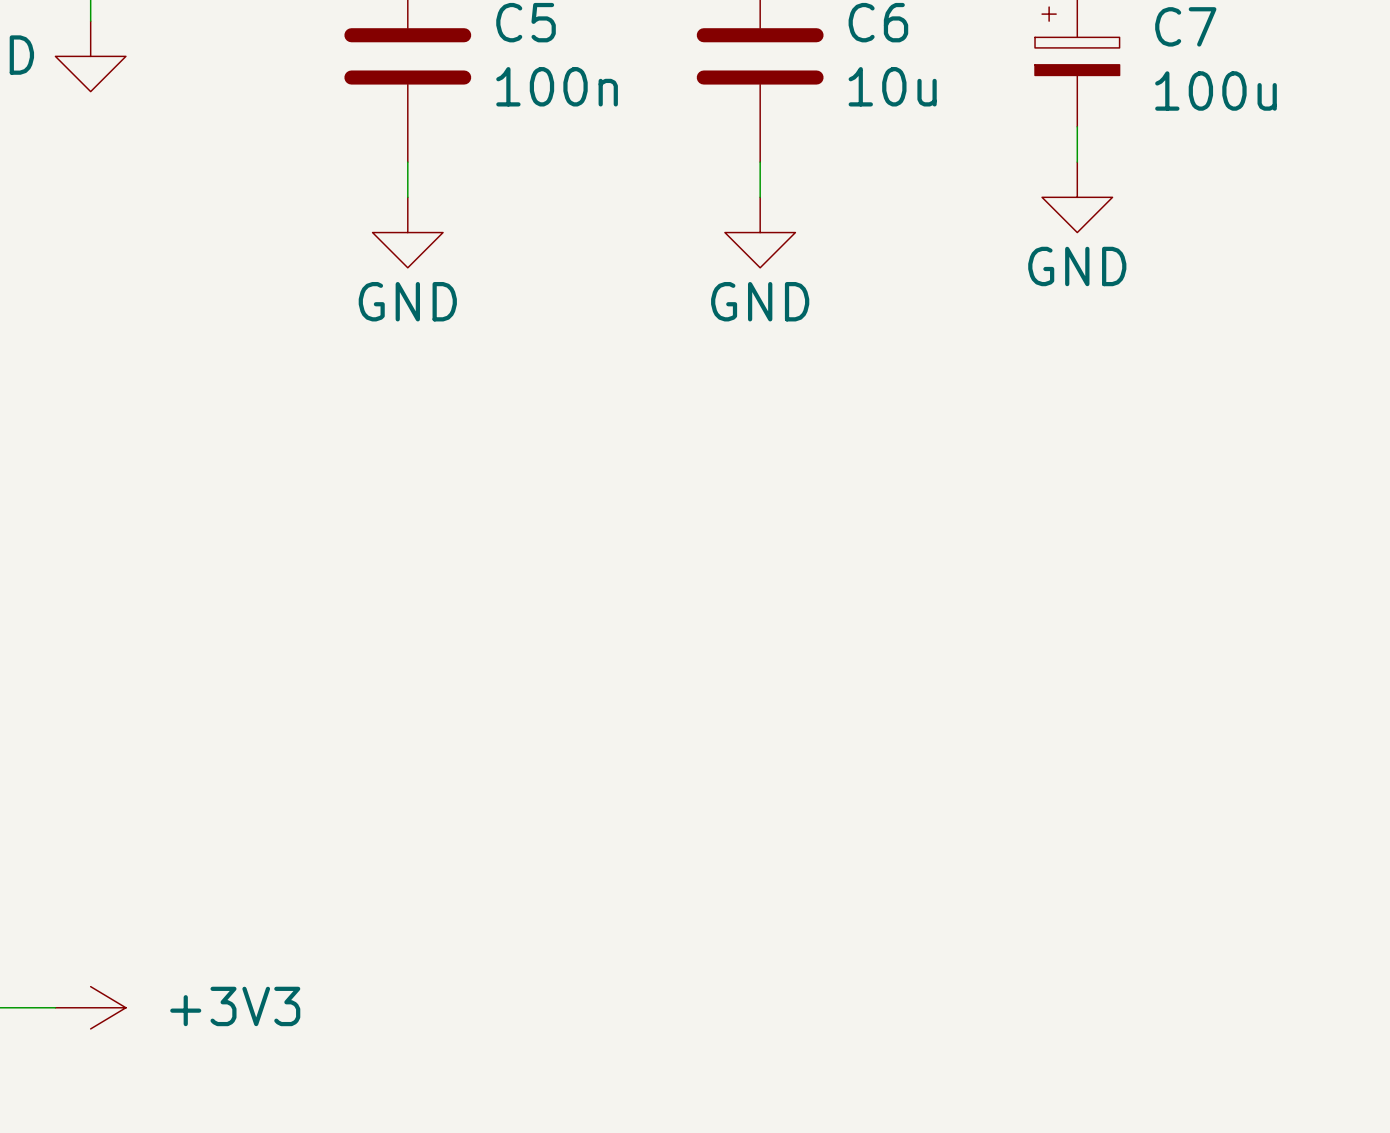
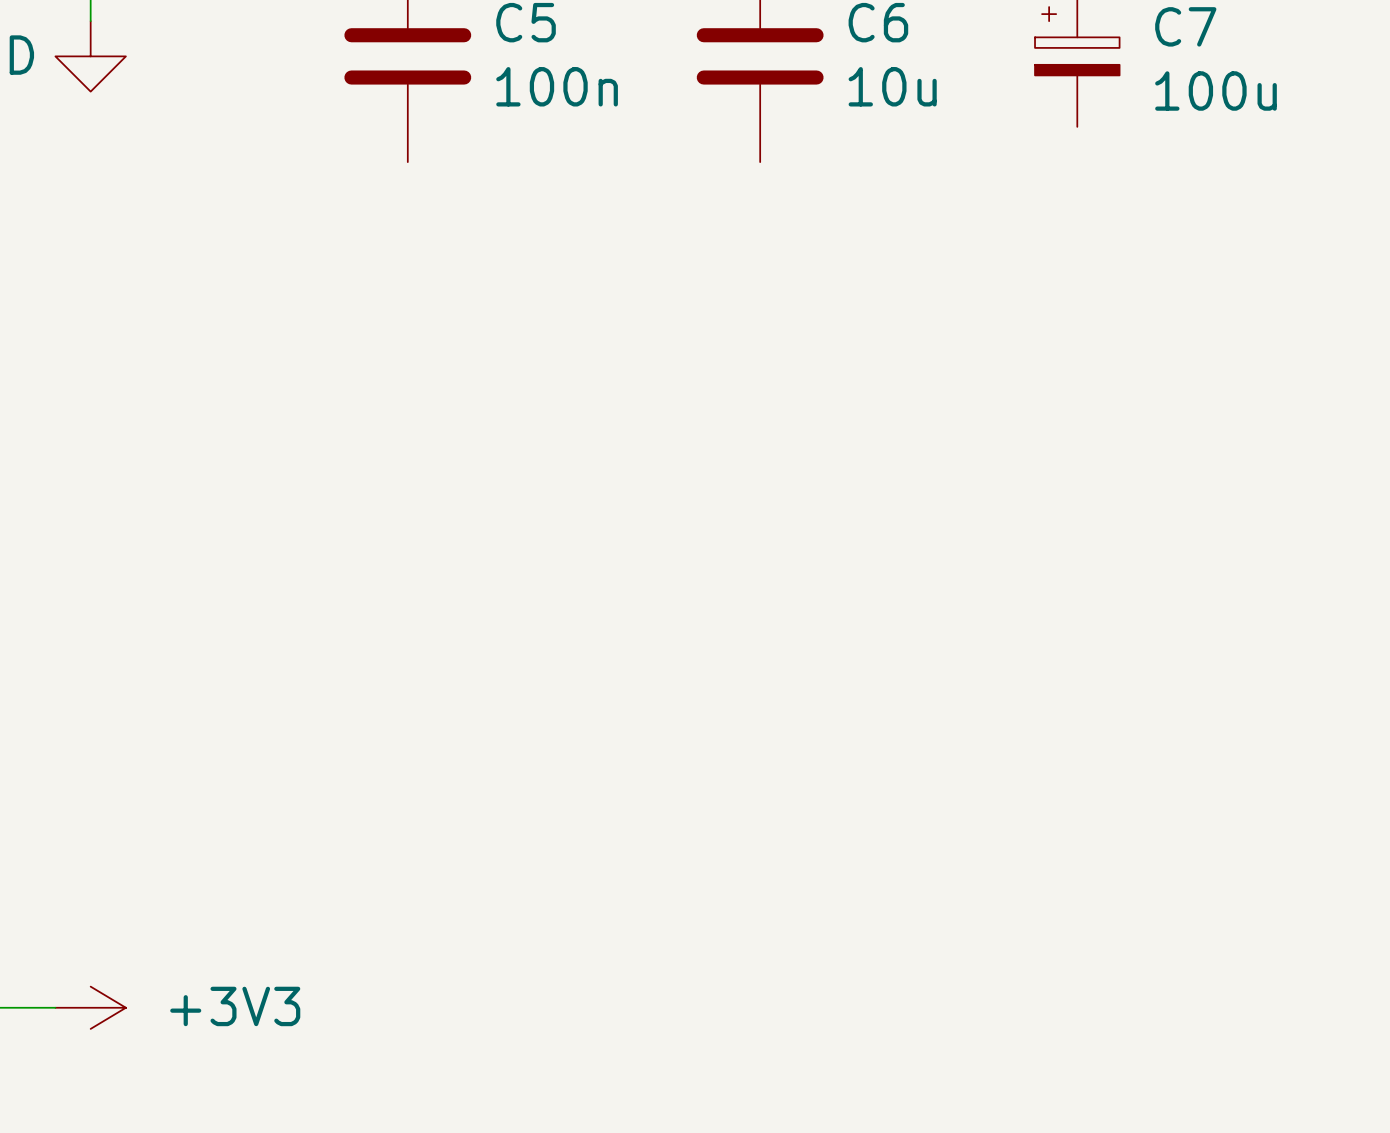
wire: (1077, 126) (1077, 162) -> none
wire: (407, 162) (407, 197) -> none
wire: (760, 162) (760, 197) -> none
power symbol: GND (1077, 197) -> none
power symbol: GND (407, 232) -> none
power symbol: GND (760, 232) -> none

